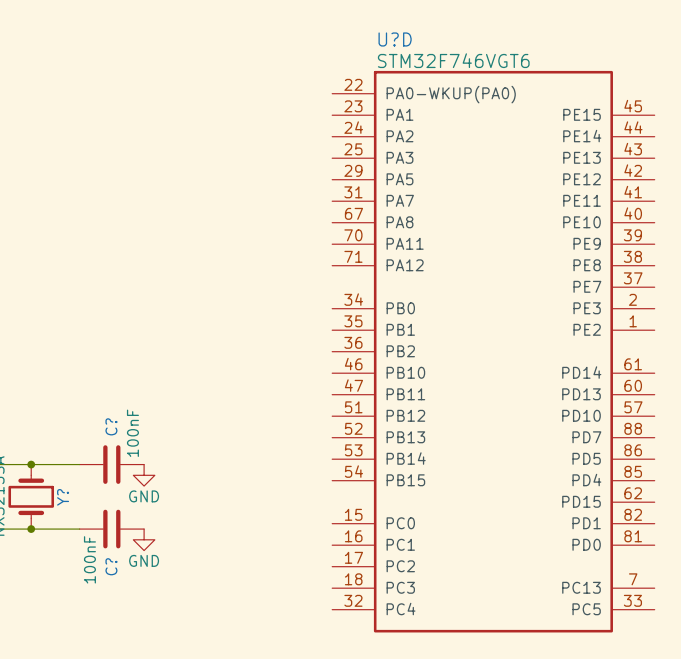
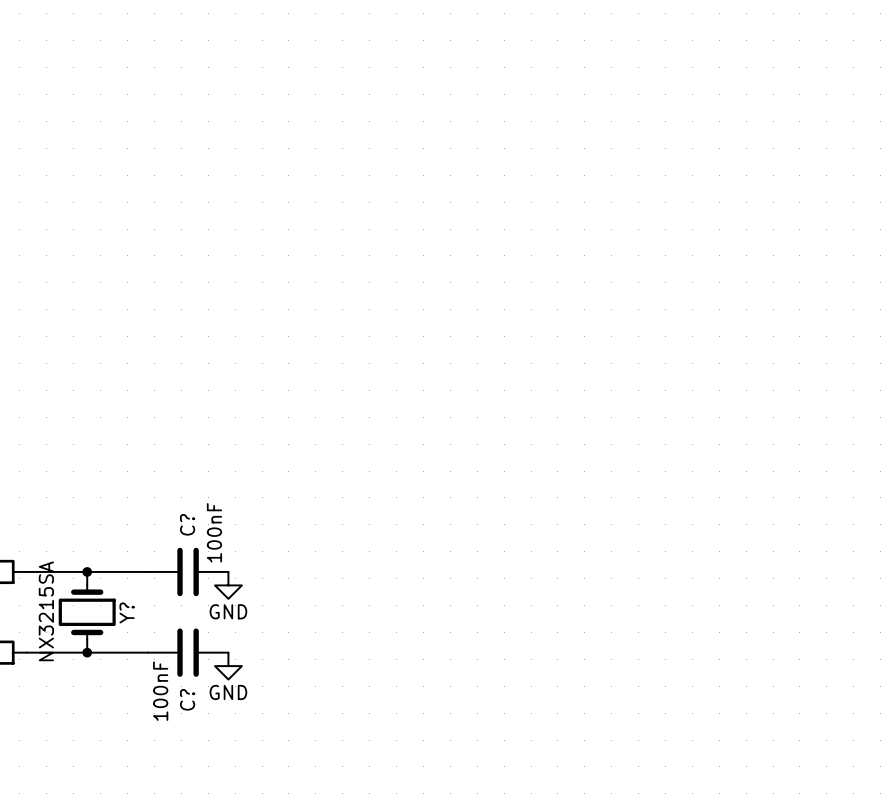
U?D: STM32F746VGT6 (493, 351) -> none

